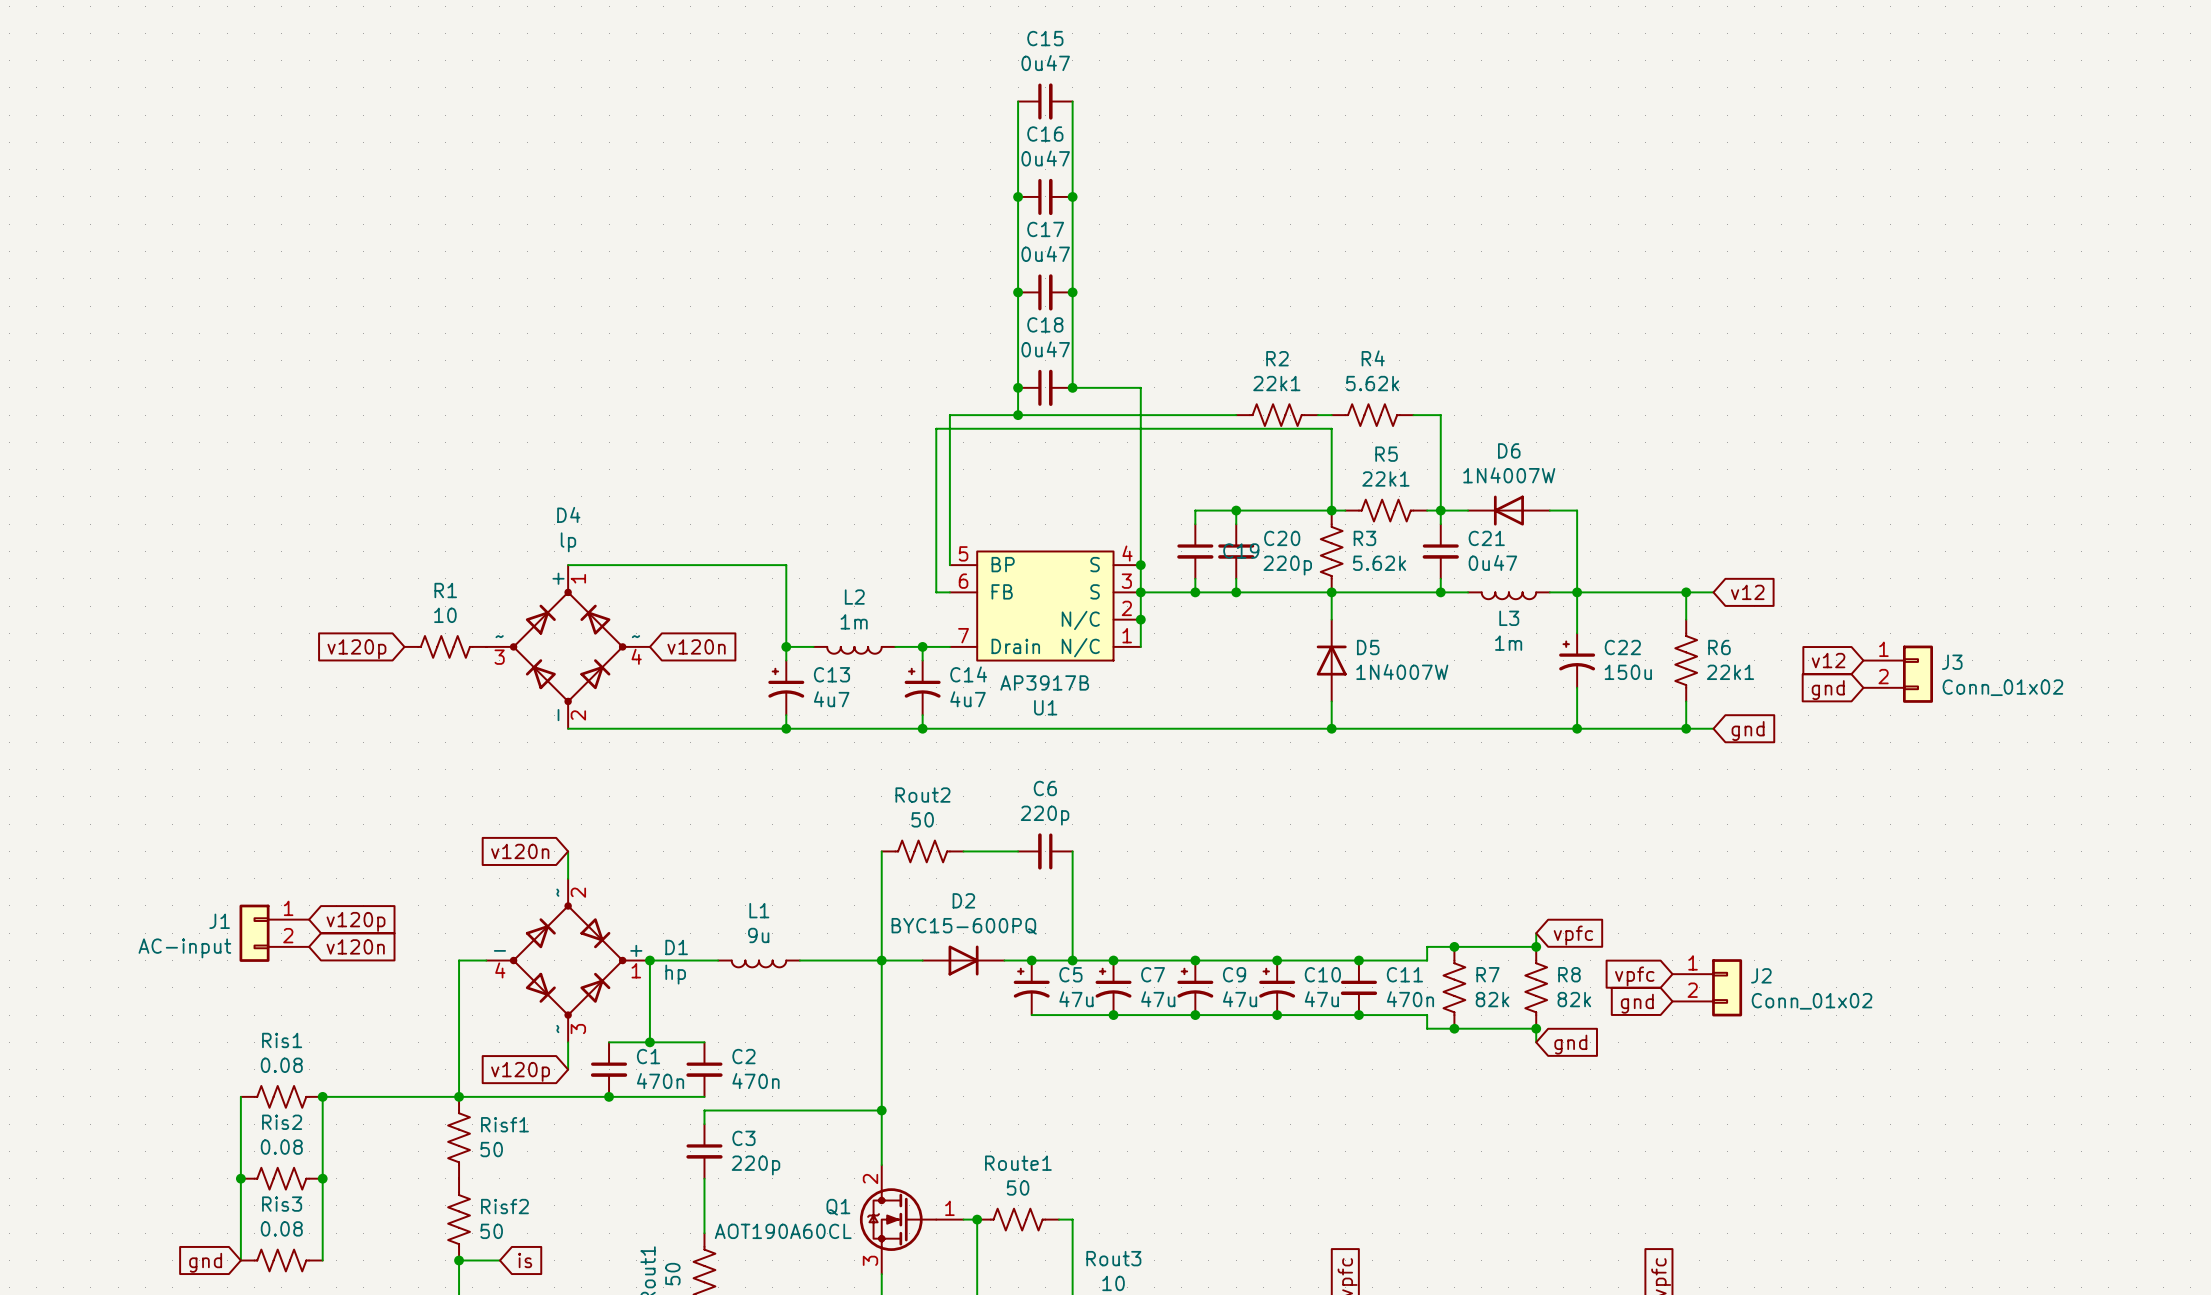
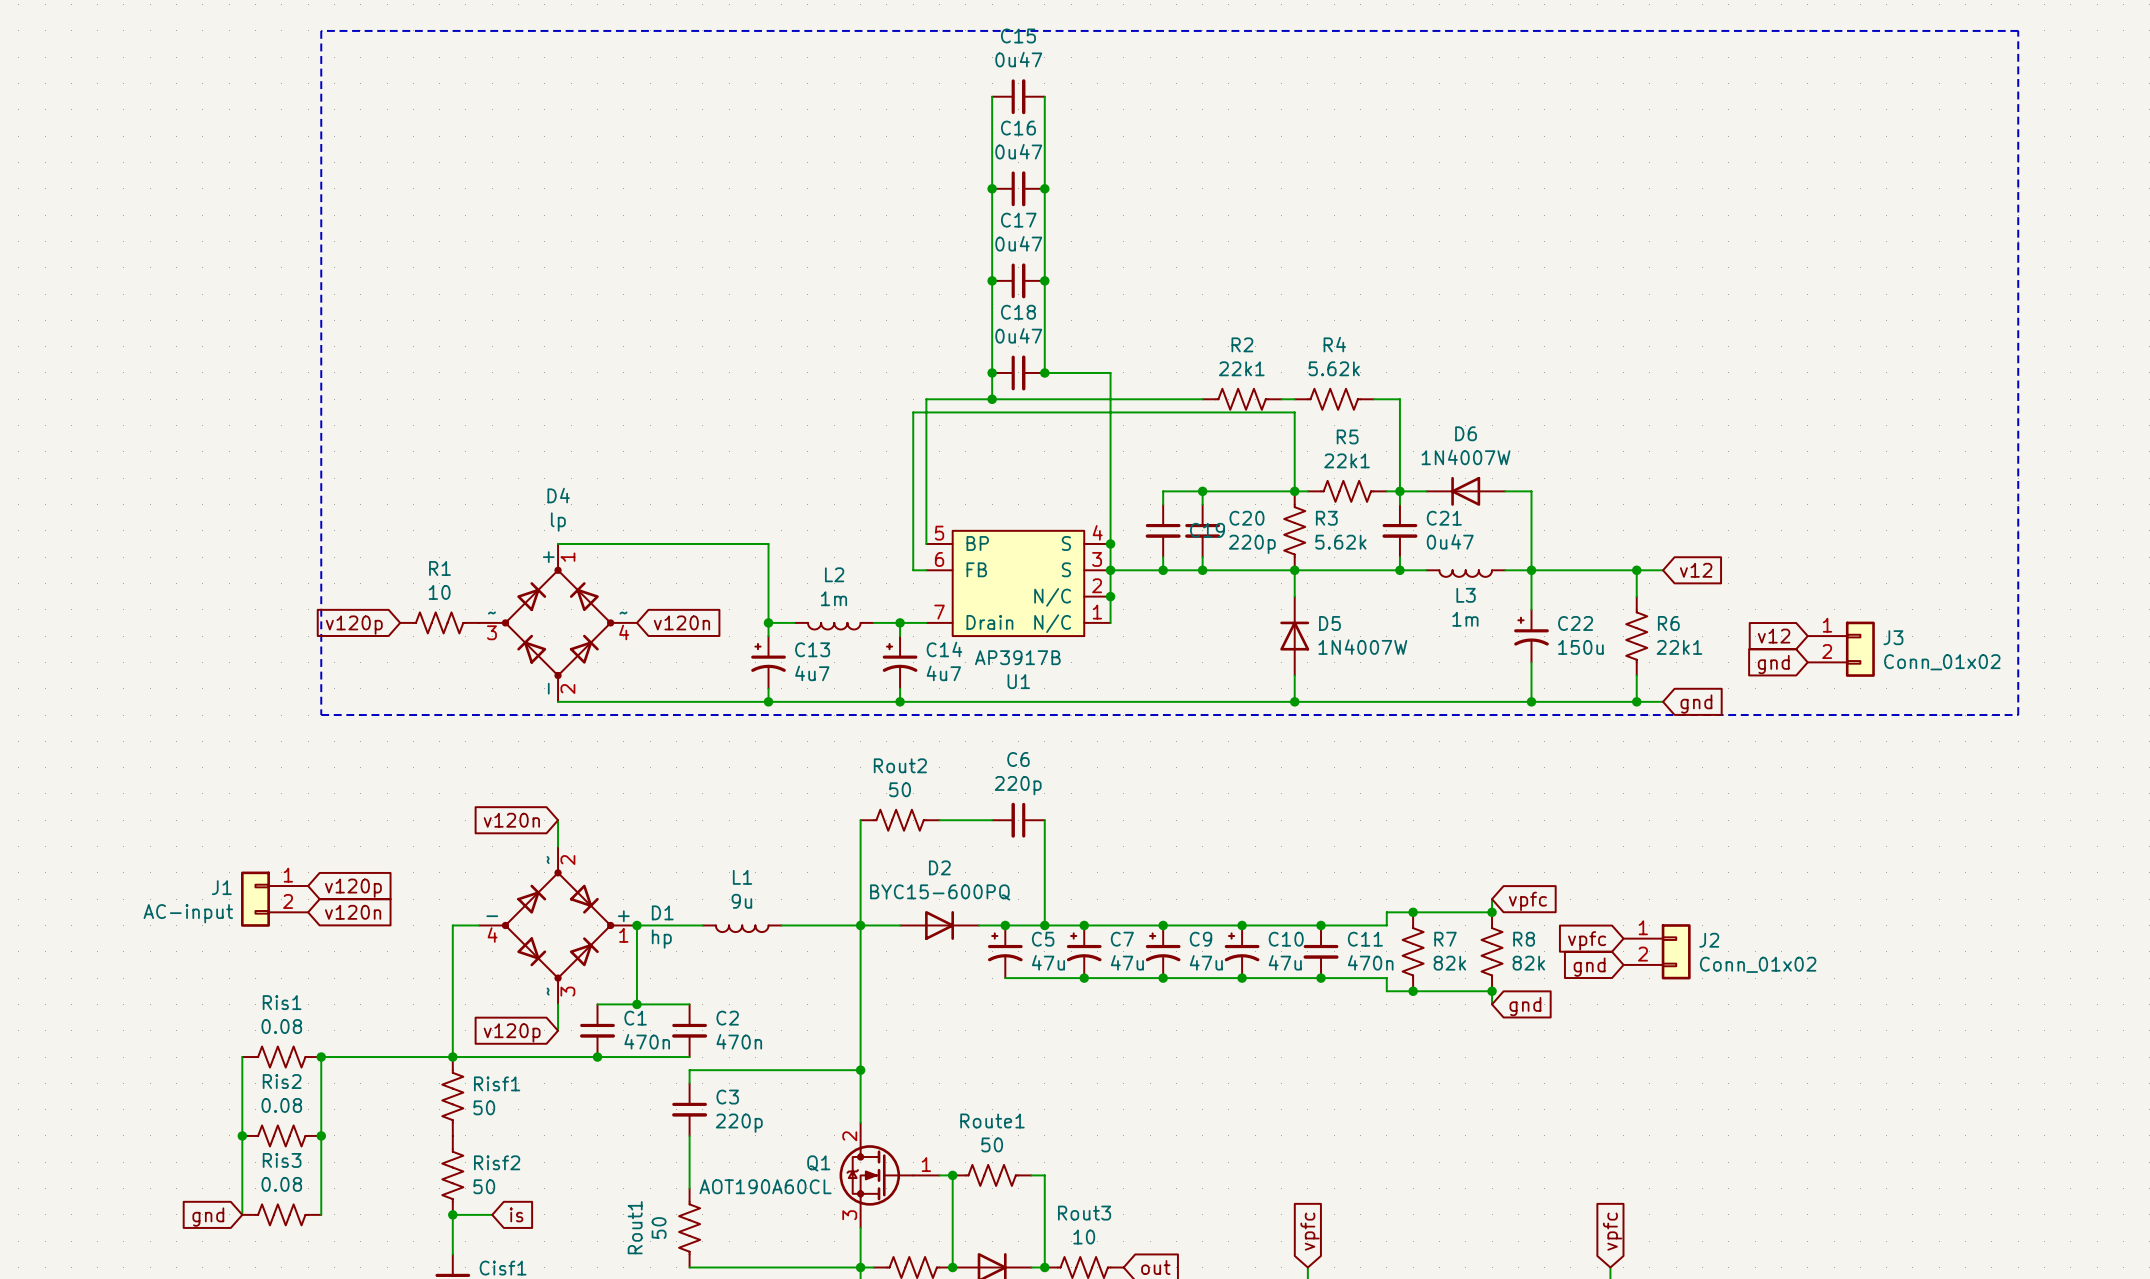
line: none -> (321, 30) (2018, 30) (2018, 715) (321, 715) (321, 30)

